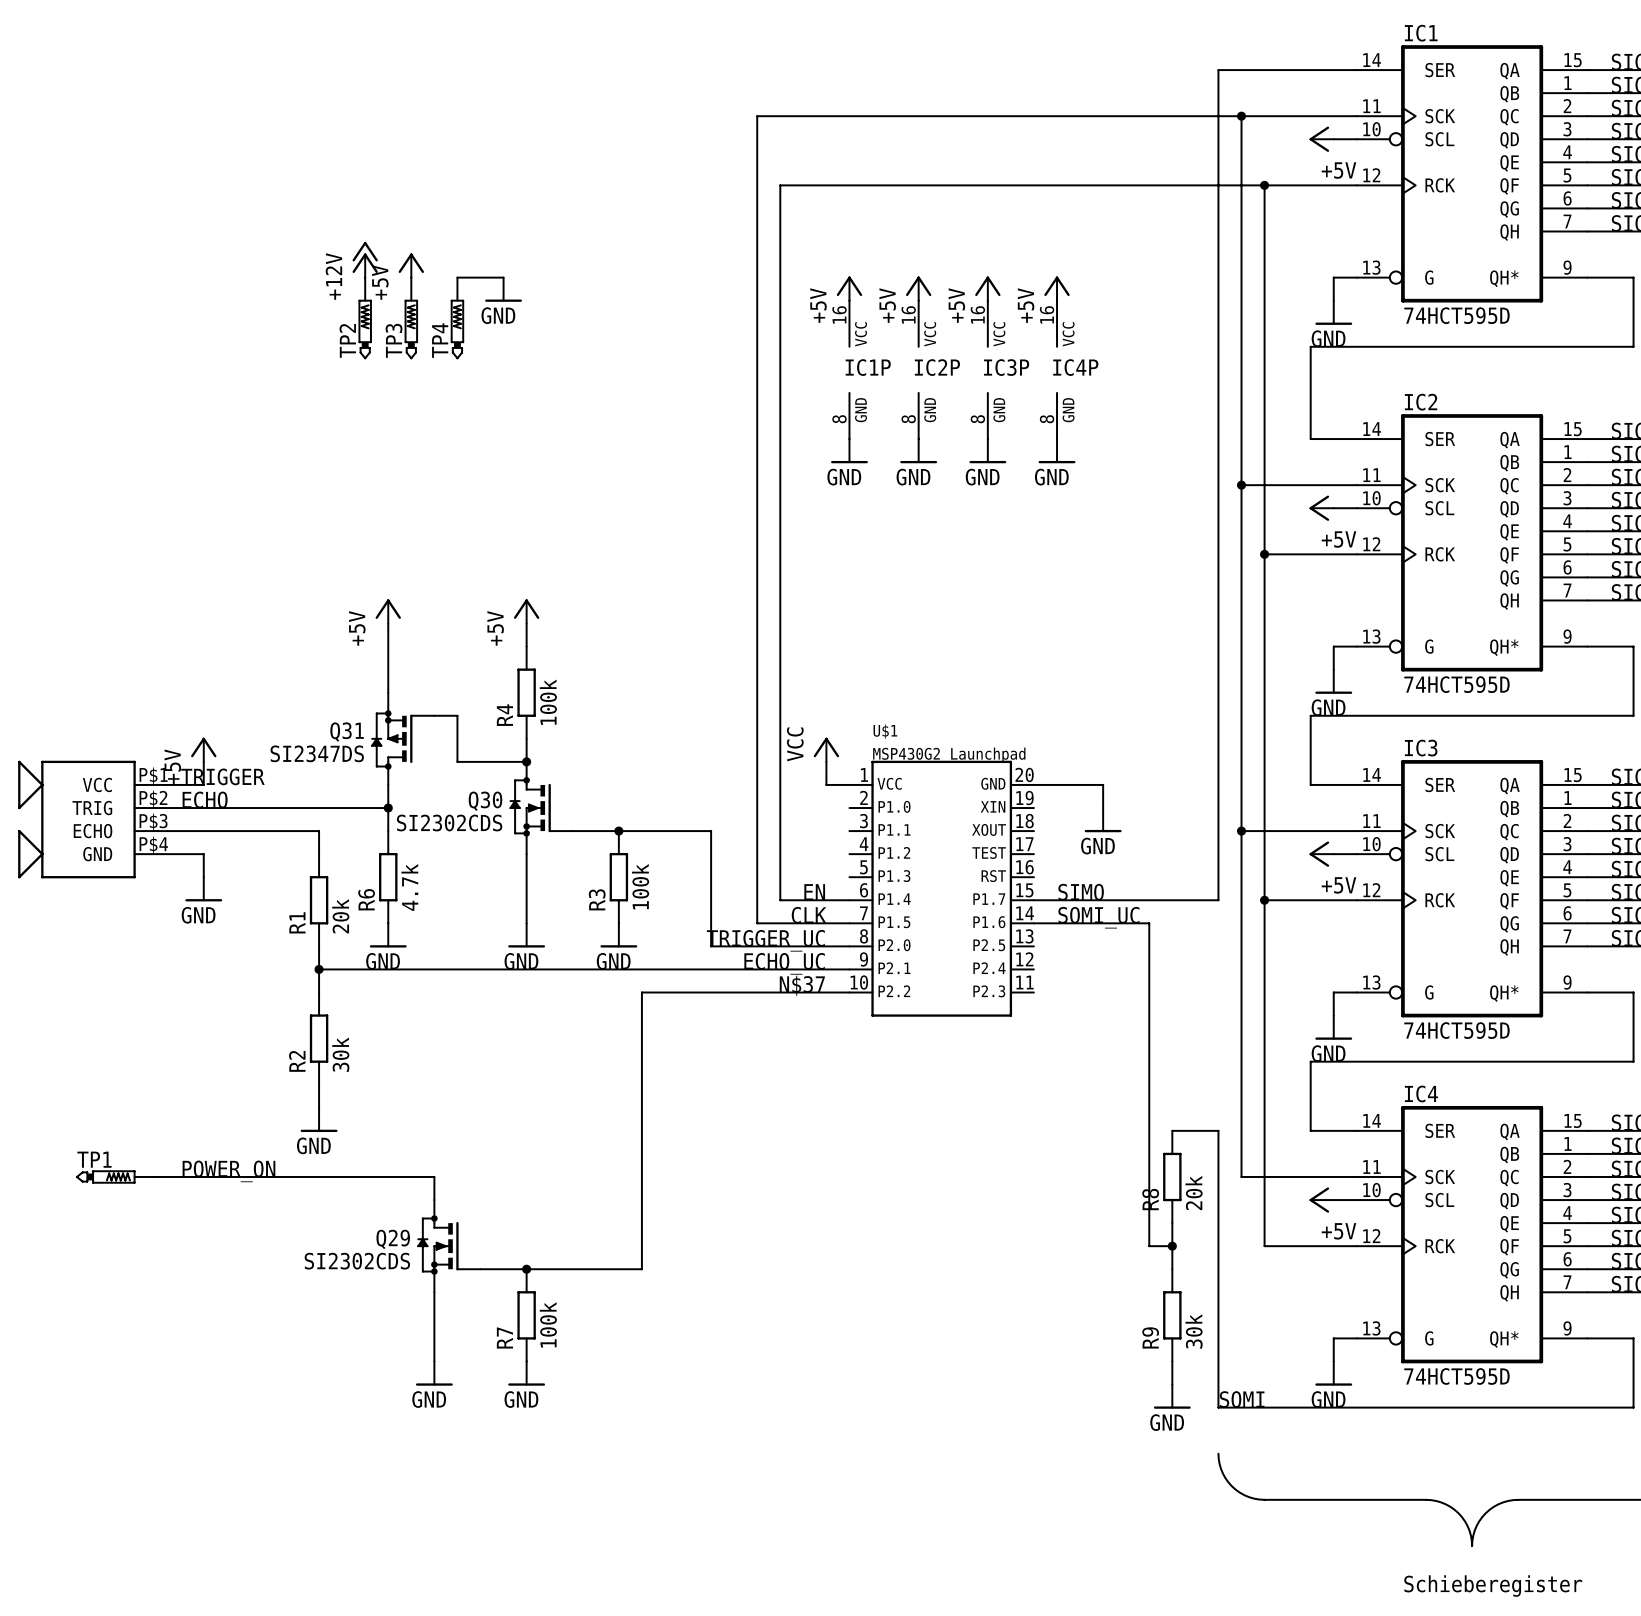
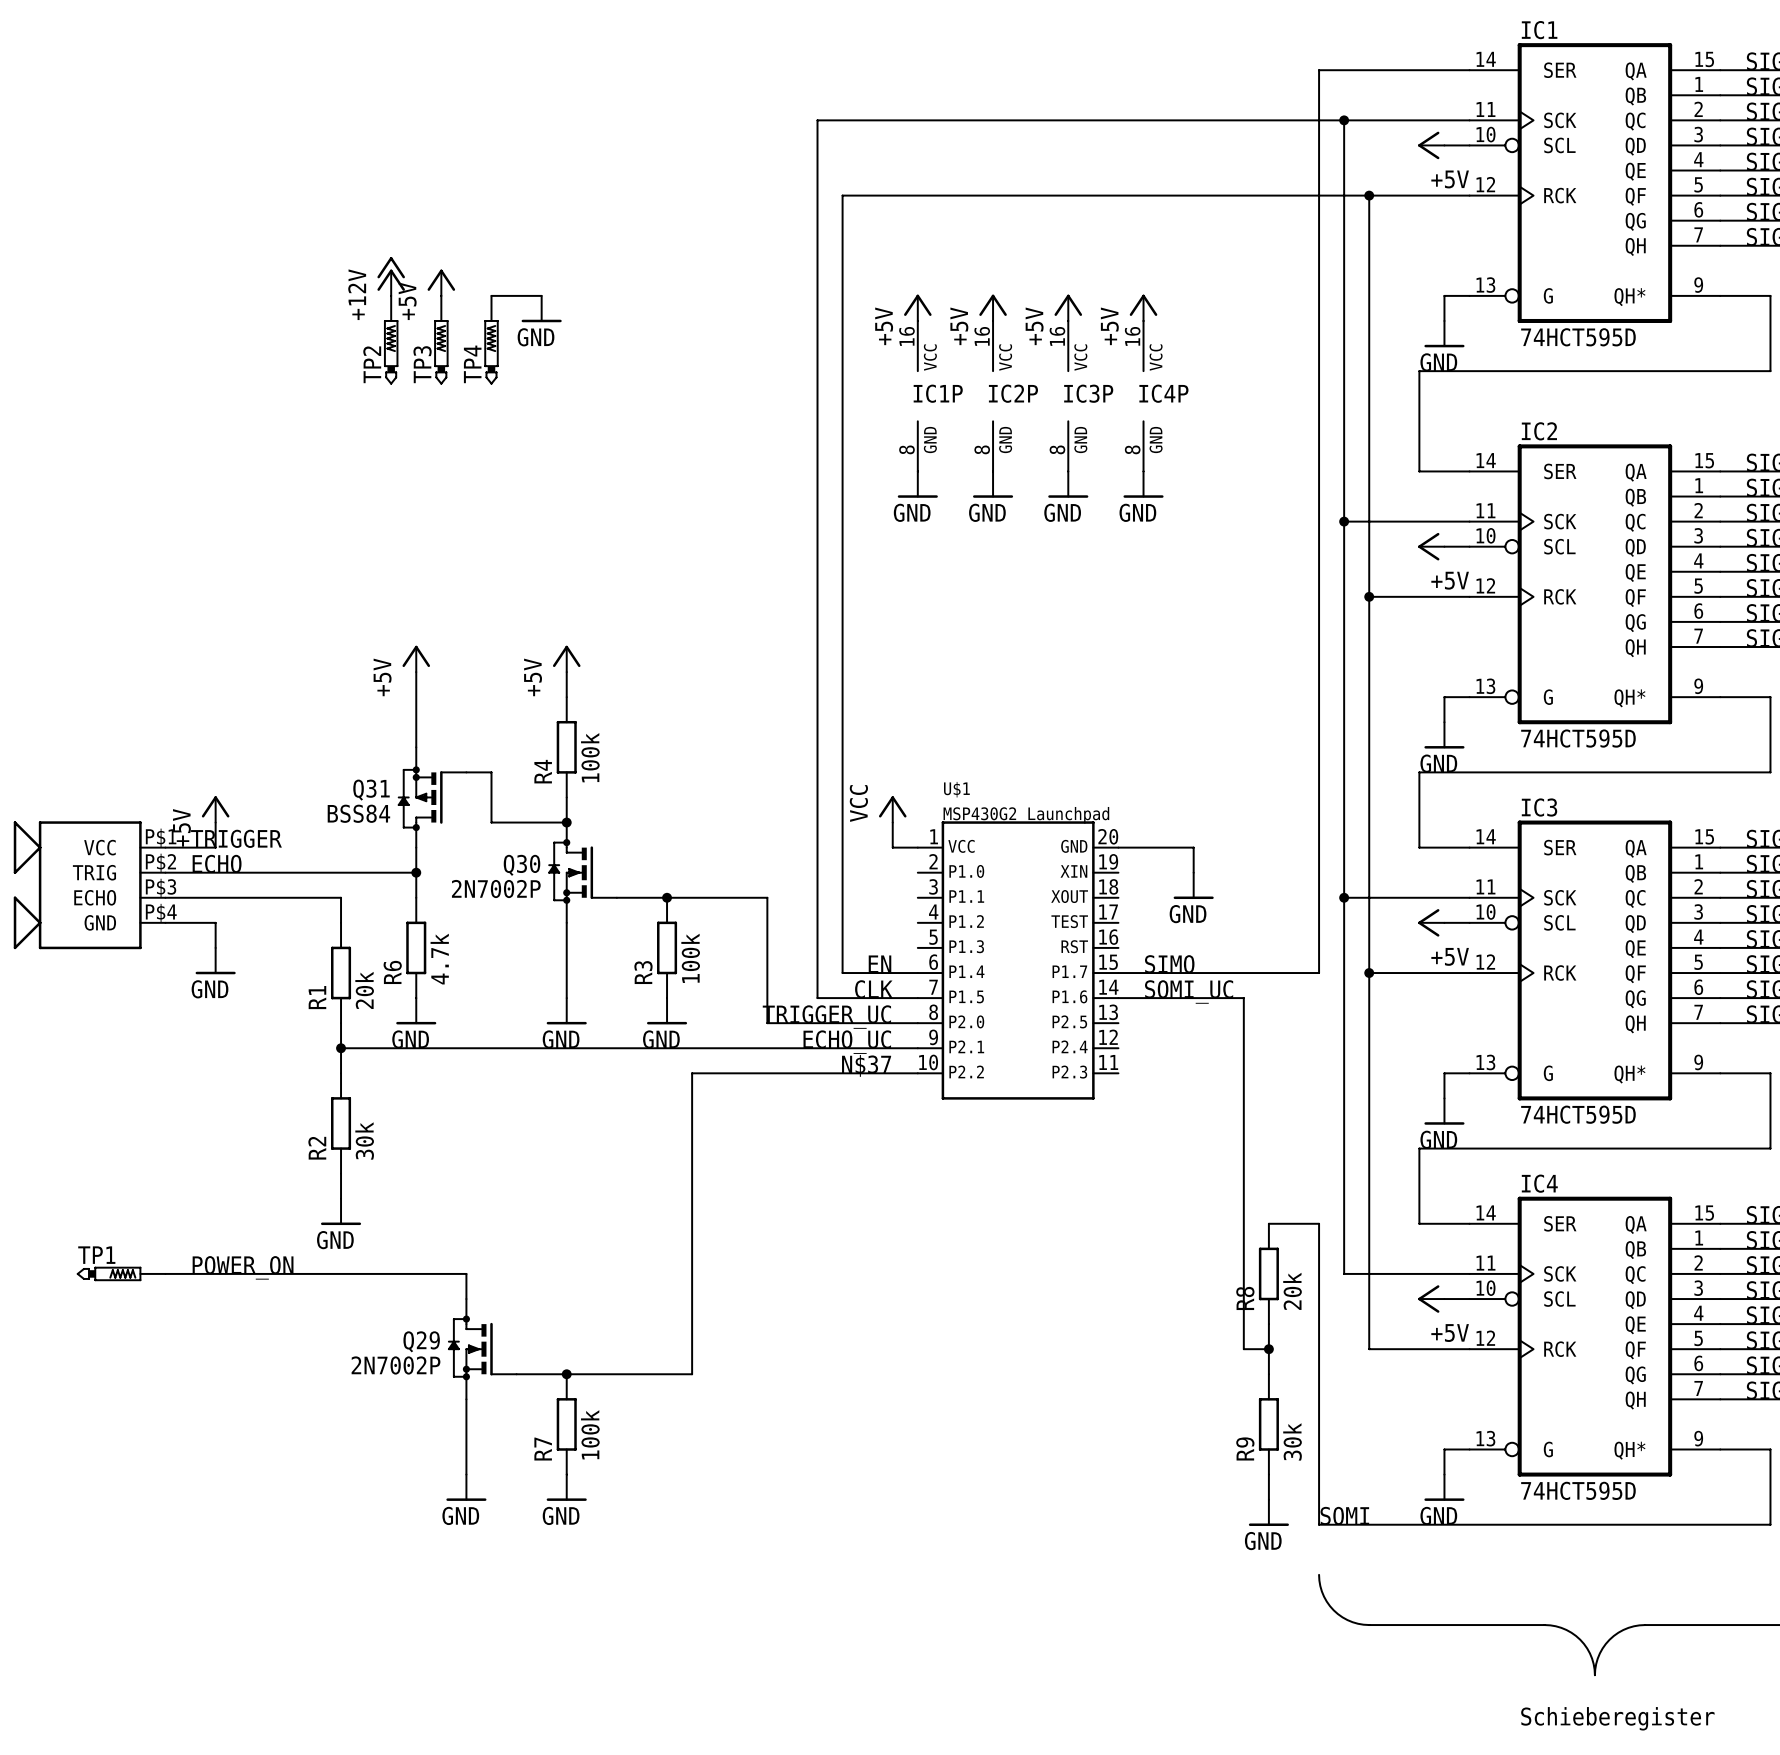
Q31 value: SI2347DS (317, 753) -> BSS84 (358, 813)
Q30 value: SI2302CDS (449, 823) -> 2N7002P (496, 889)
Q29 value: SI2302CDS (357, 1261) -> 2N7002P (396, 1365)

